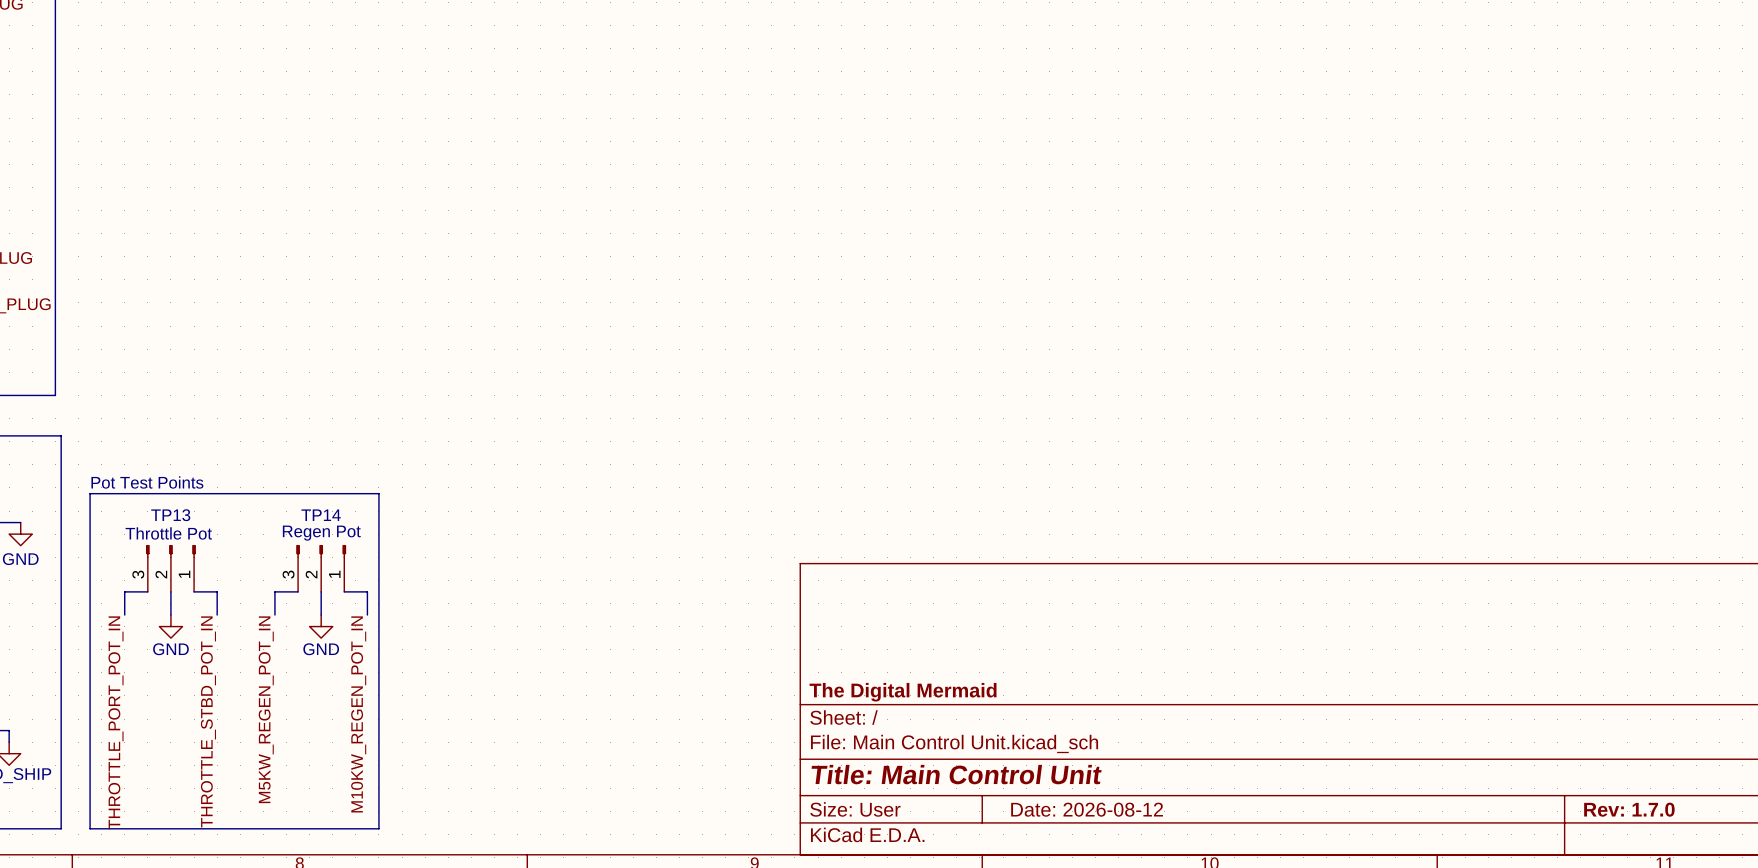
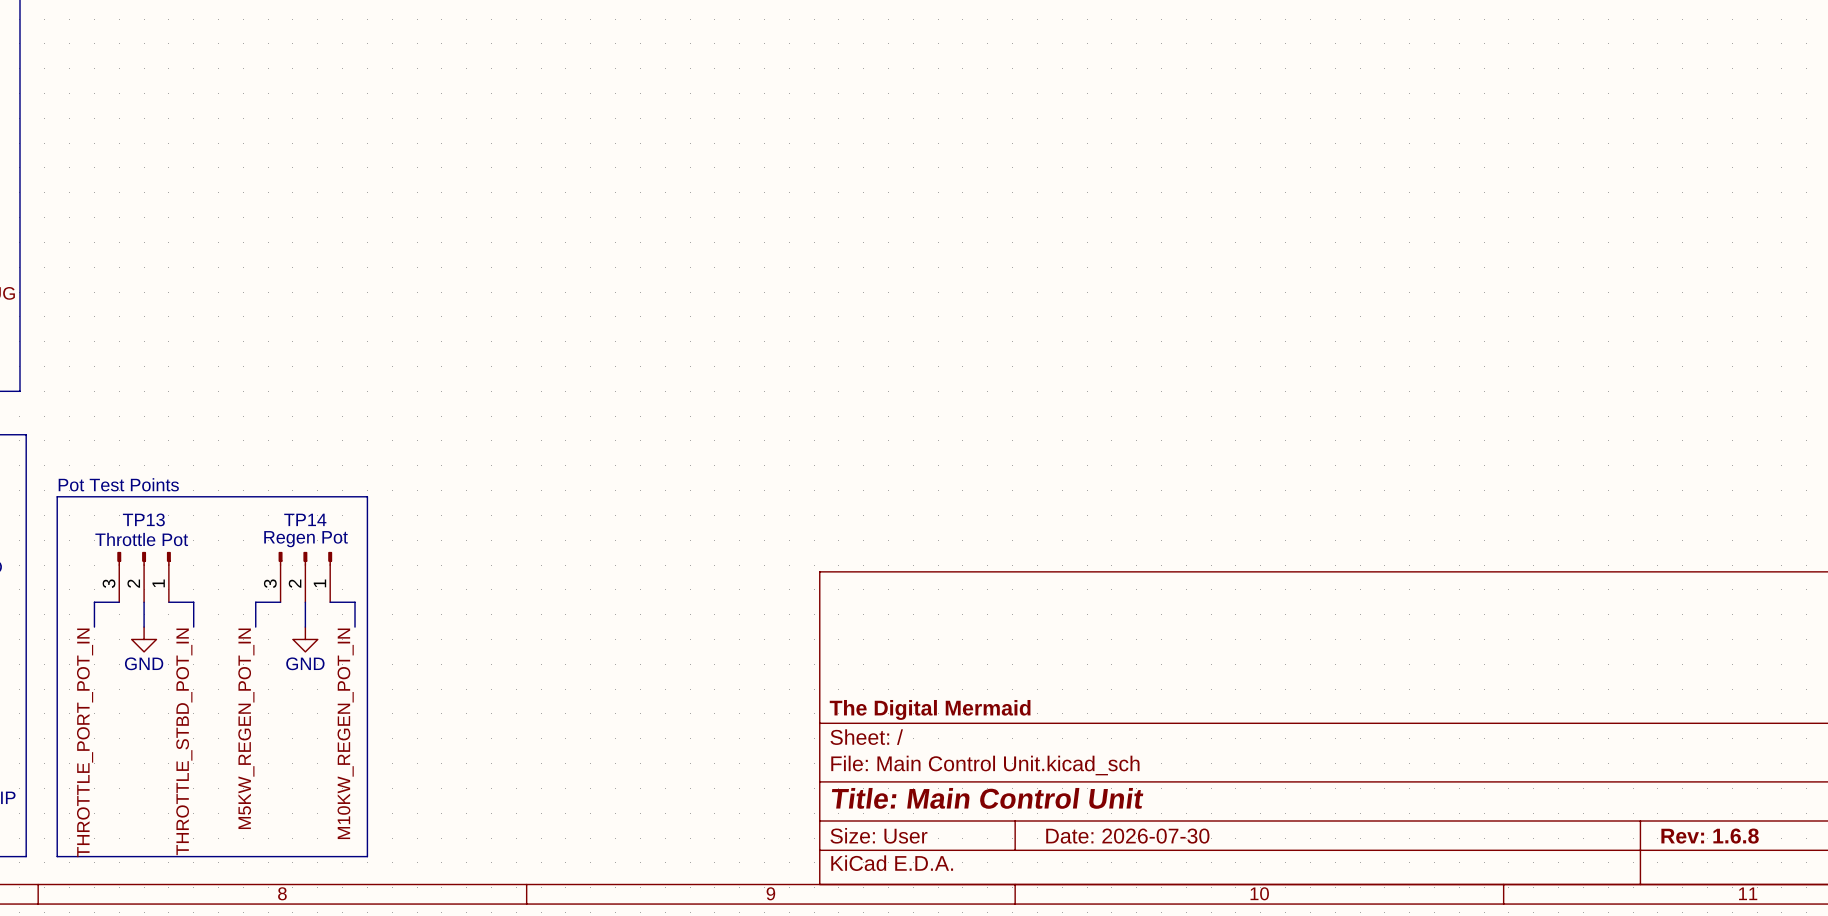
title block: Date: 2026-08-12 (1087, 809) -> Date: 2026-07-30 (1127, 836)
title block: Rev: 1.7.0 (1629, 809) -> Rev: 1.6.8 (1710, 836)

